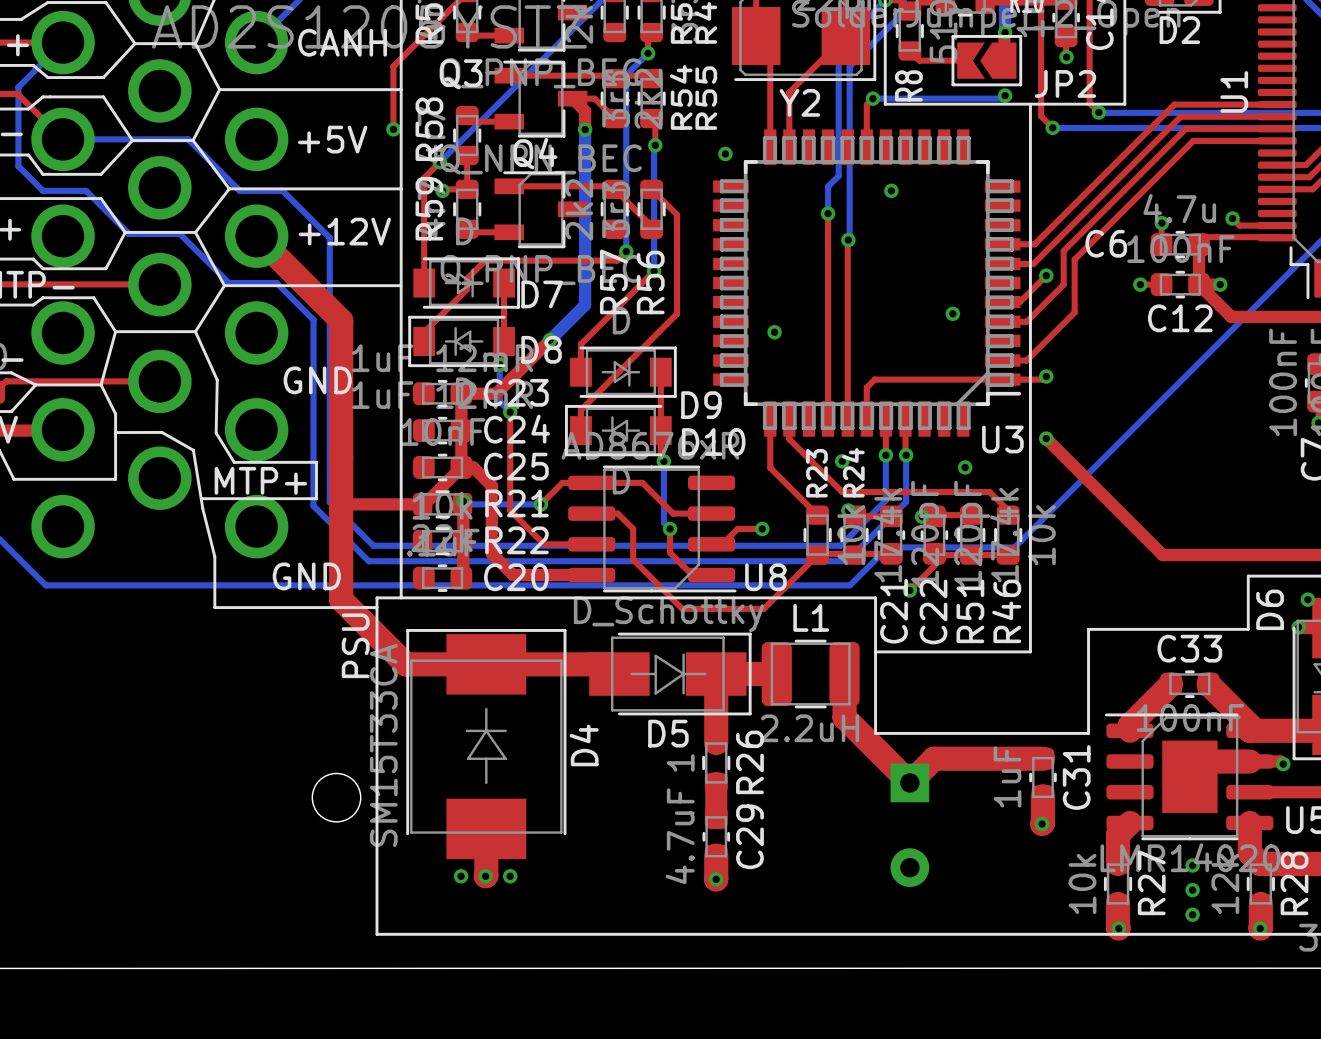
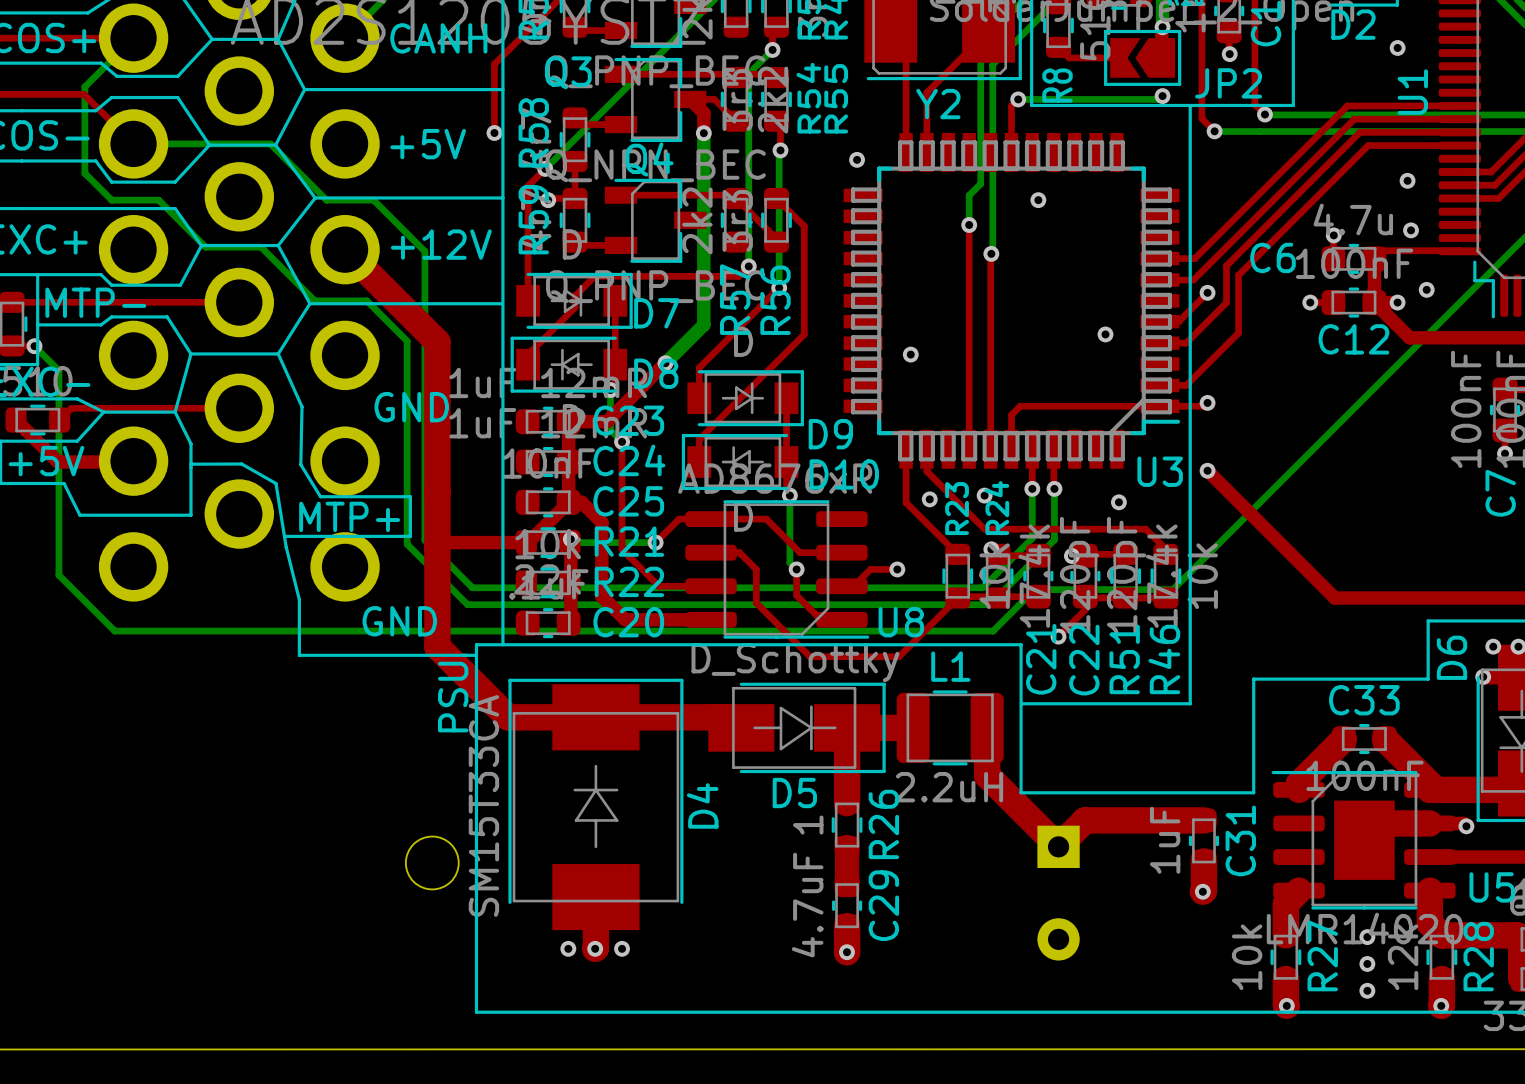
via: none -> (1397, 47)
via: none -> (1407, 180)
top track: (1232, 218) (1239, 225) (1277, 225) -> none
via: none -> (1426, 289)
via: none -> (929, 499)

